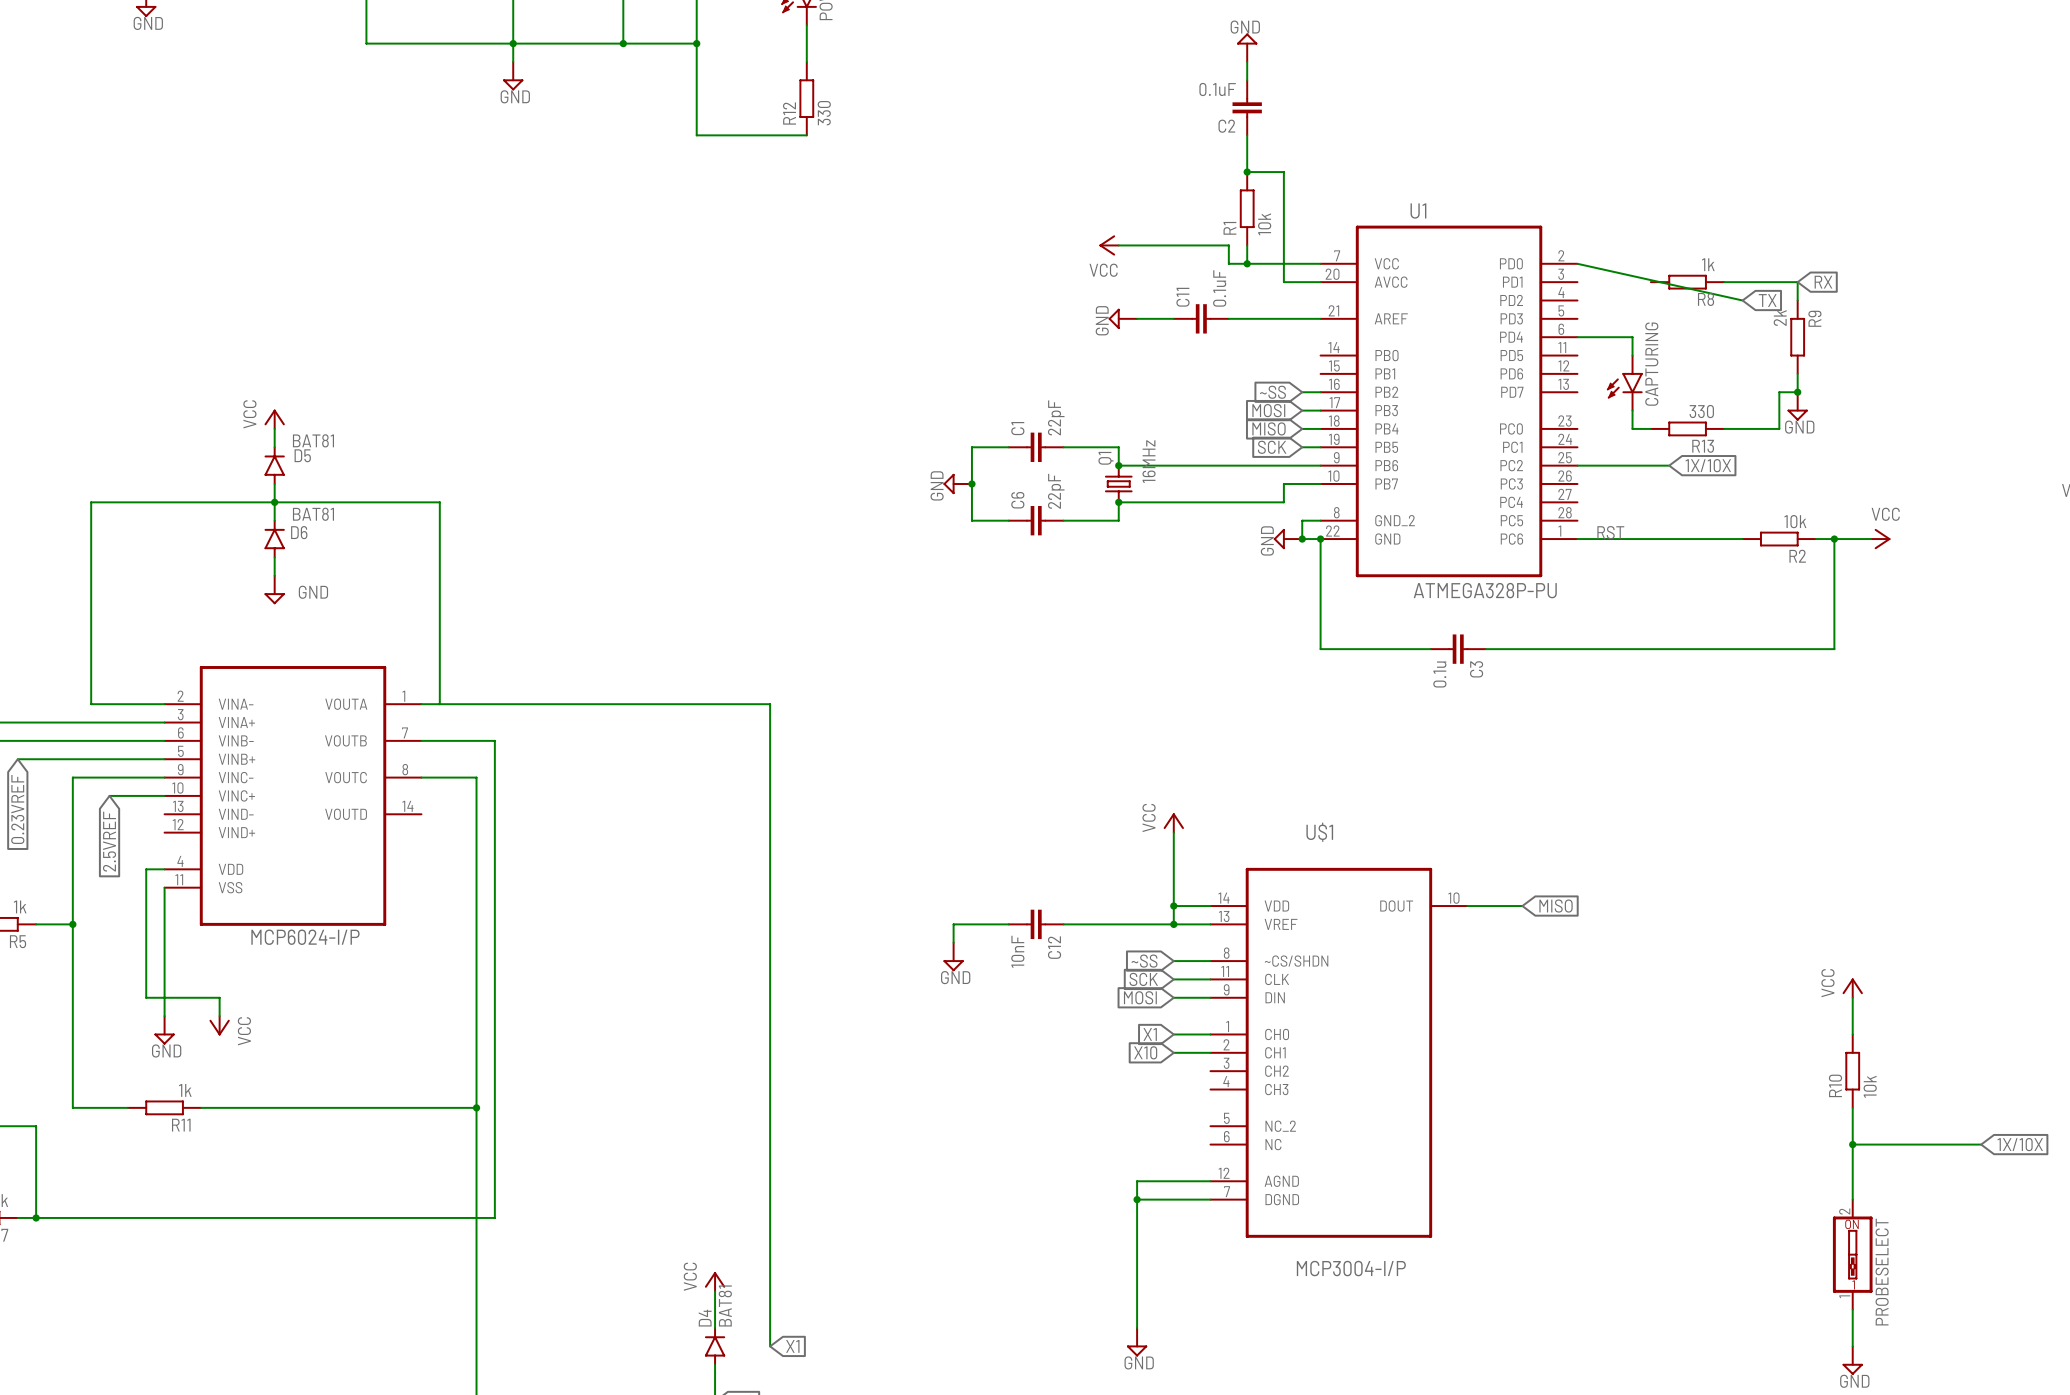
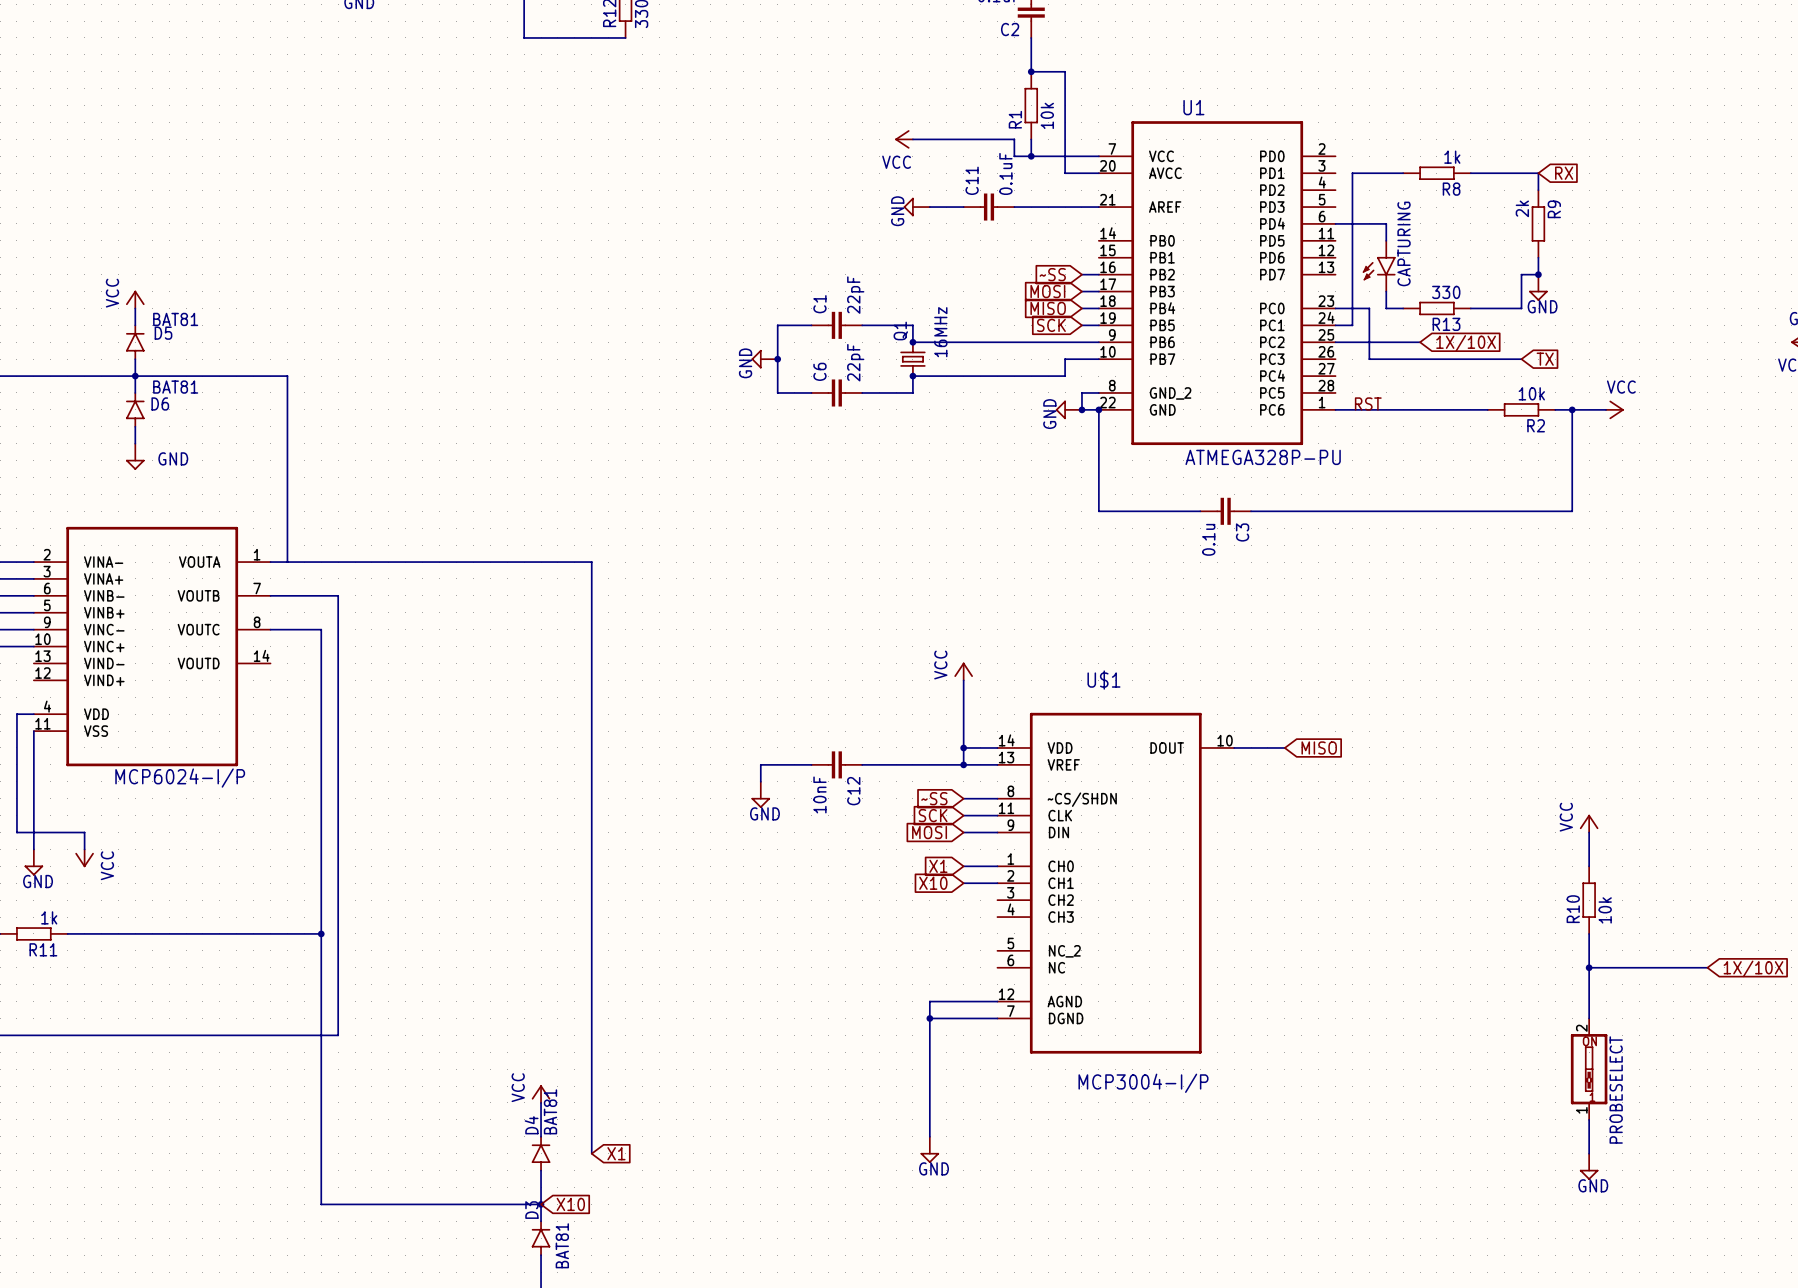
wire: (1577, 263) (1742, 300) -> none
wire: none -> (1403, 173) (1352, 173) (1352, 325) (1335, 325)
global label: TX (1767, 300) -> none
wire: none -> (1335, 308) (1369, 308) (1369, 359) (1521, 359)
global label: none -> TX (1545, 359)

